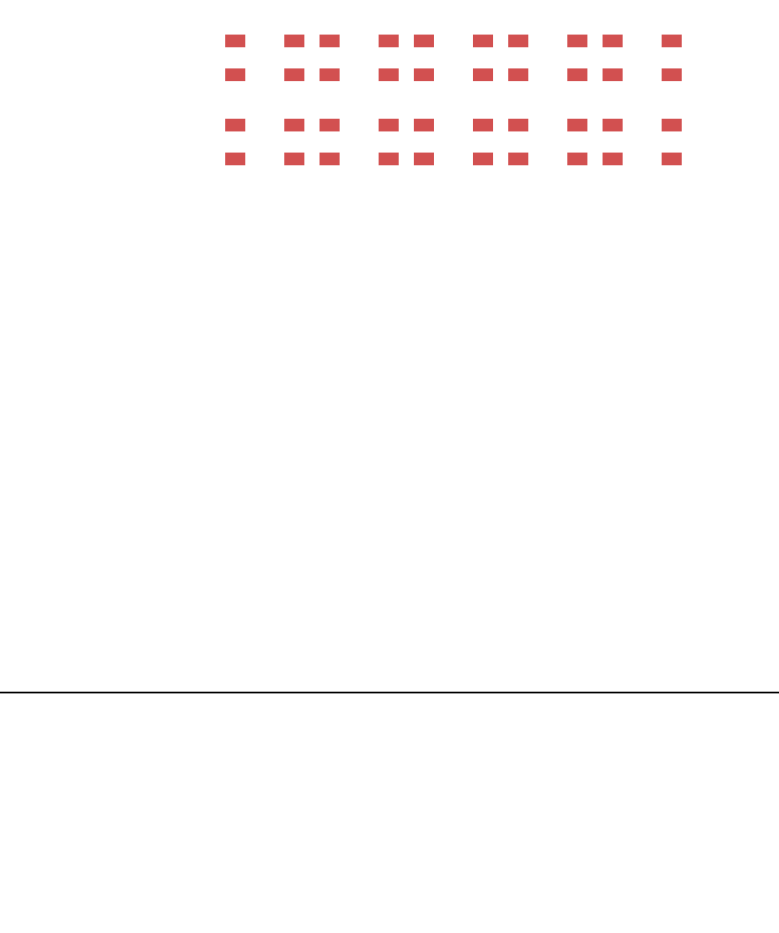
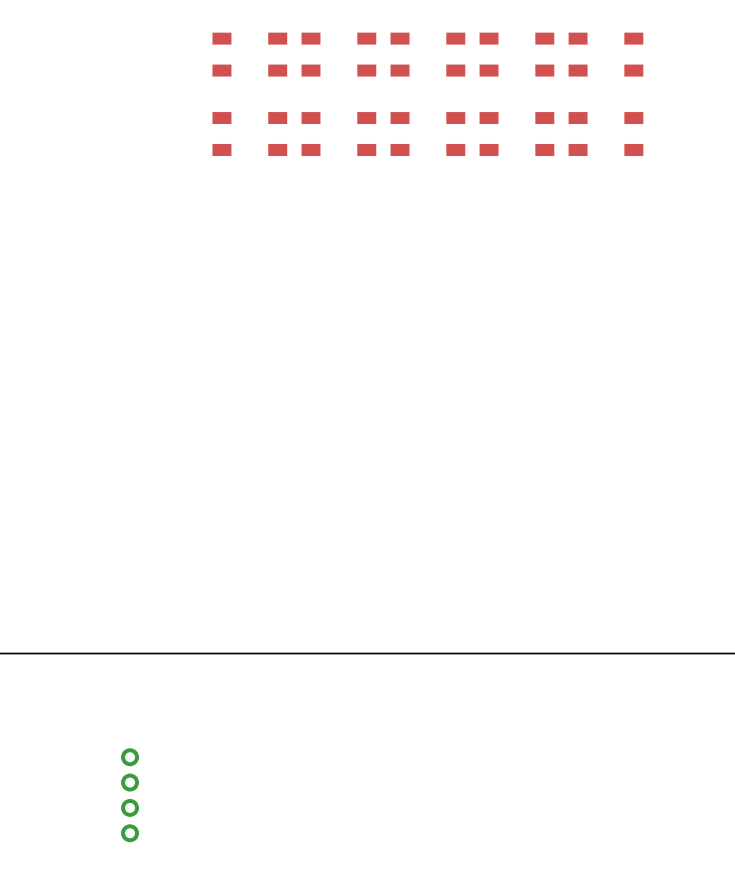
part: none -> (130, 795)

